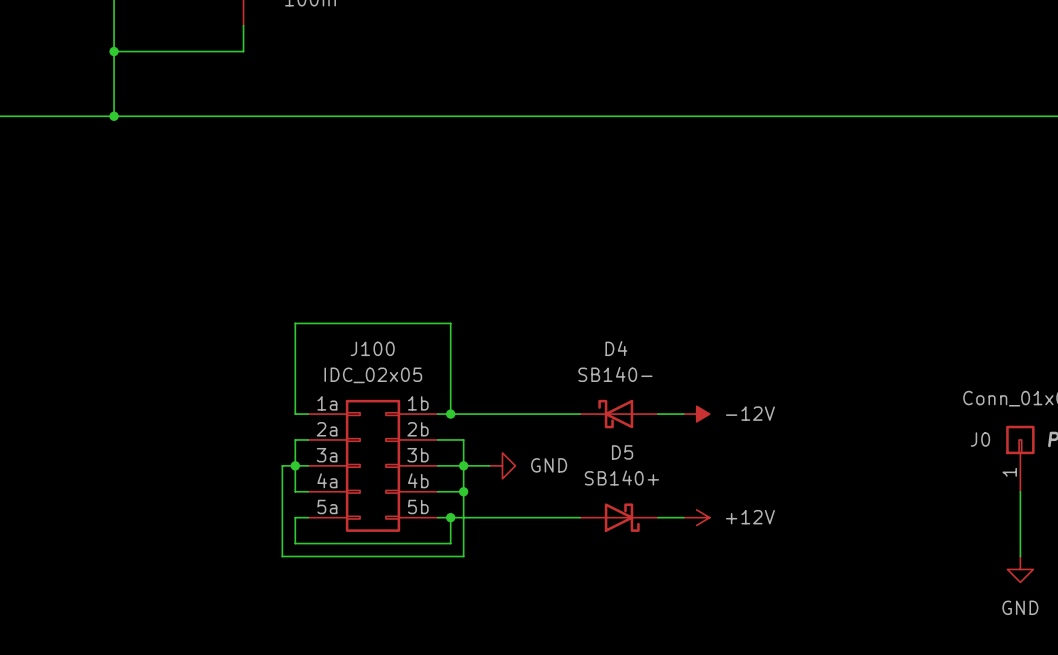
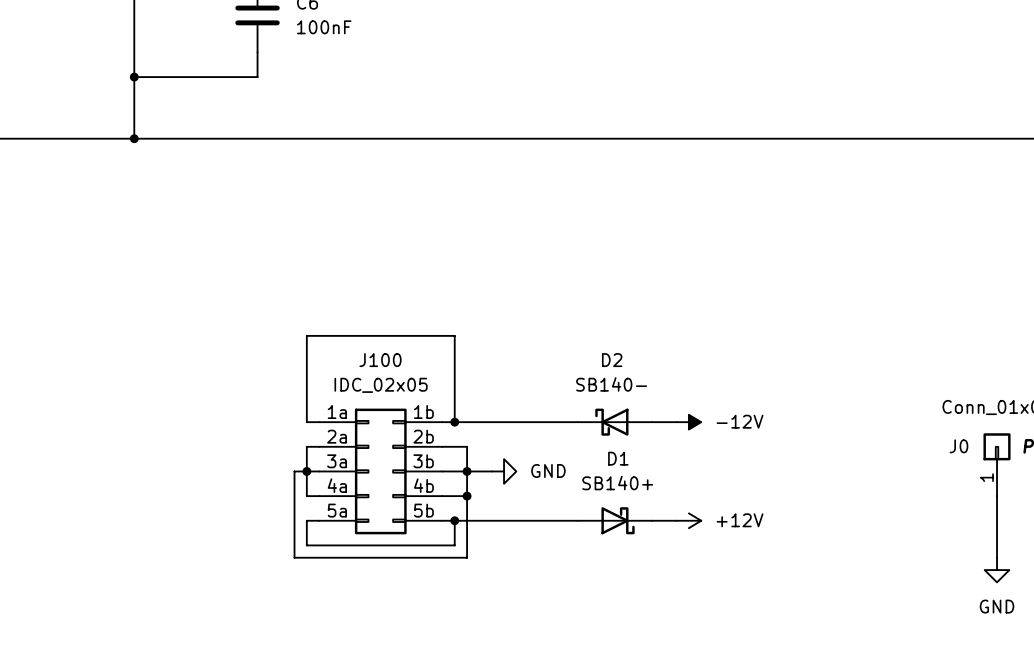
D4 name: D4 (616, 348) -> D2 (612, 360)
D5 name: D5 (622, 452) -> D1 (618, 458)

